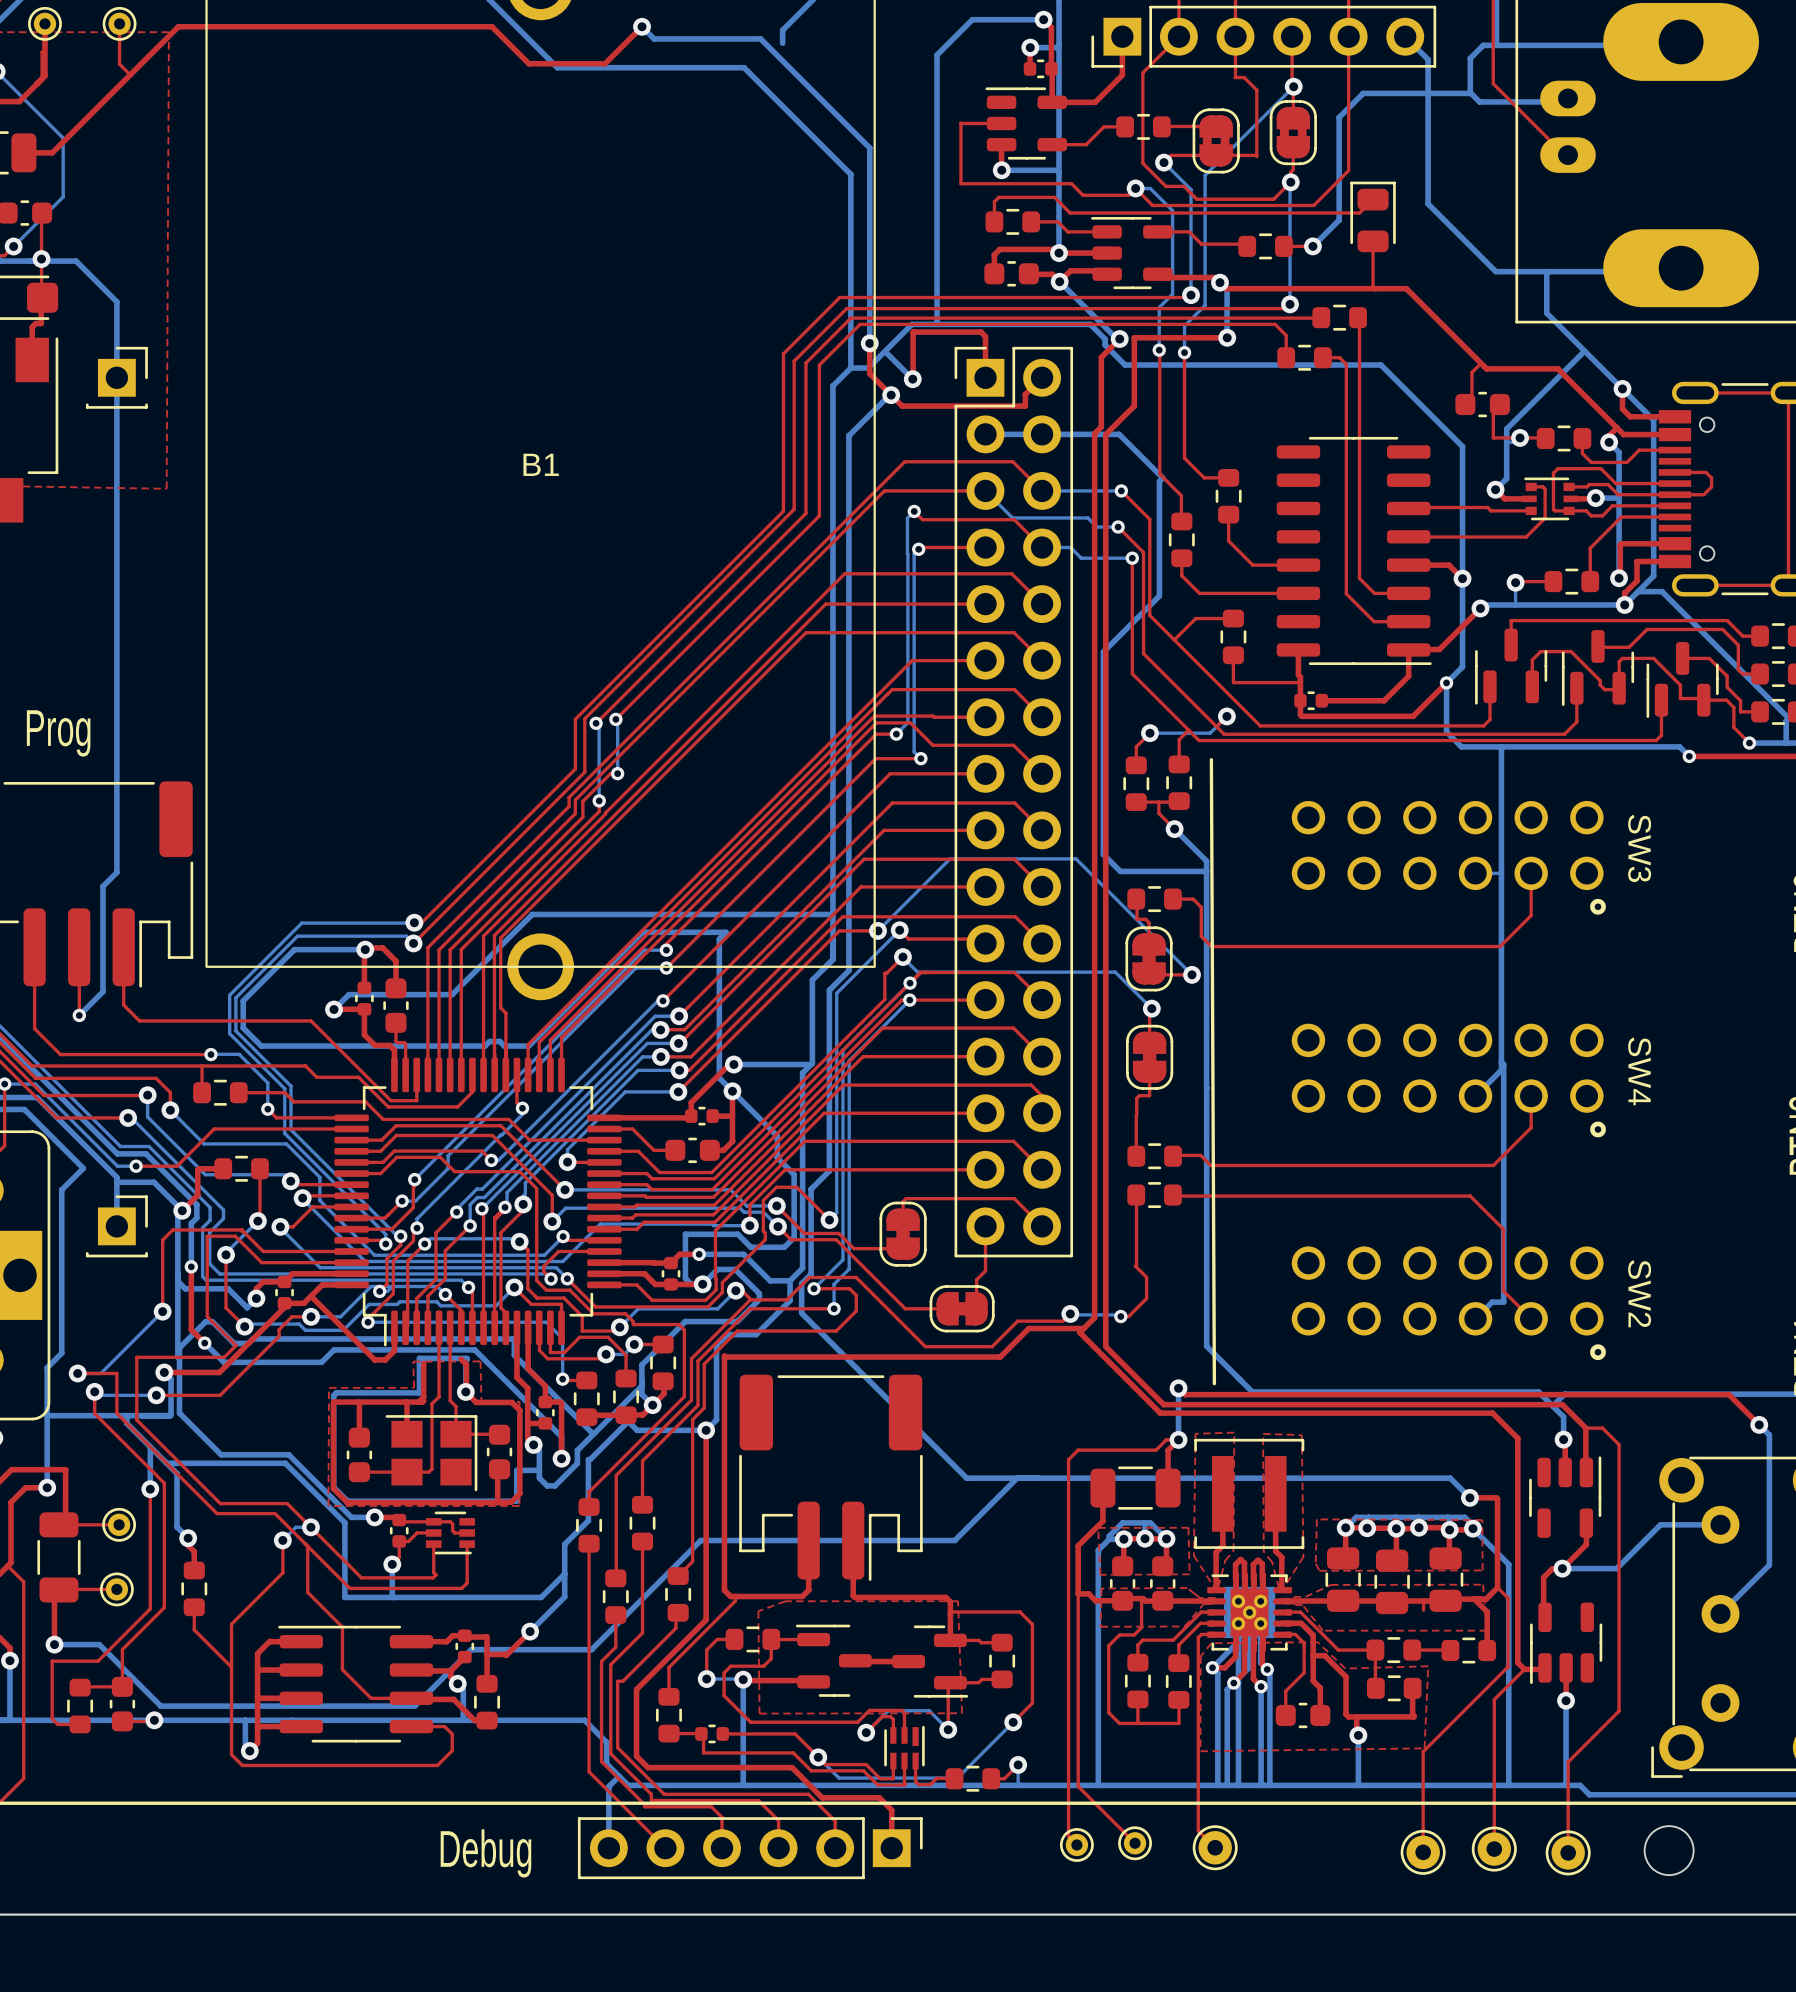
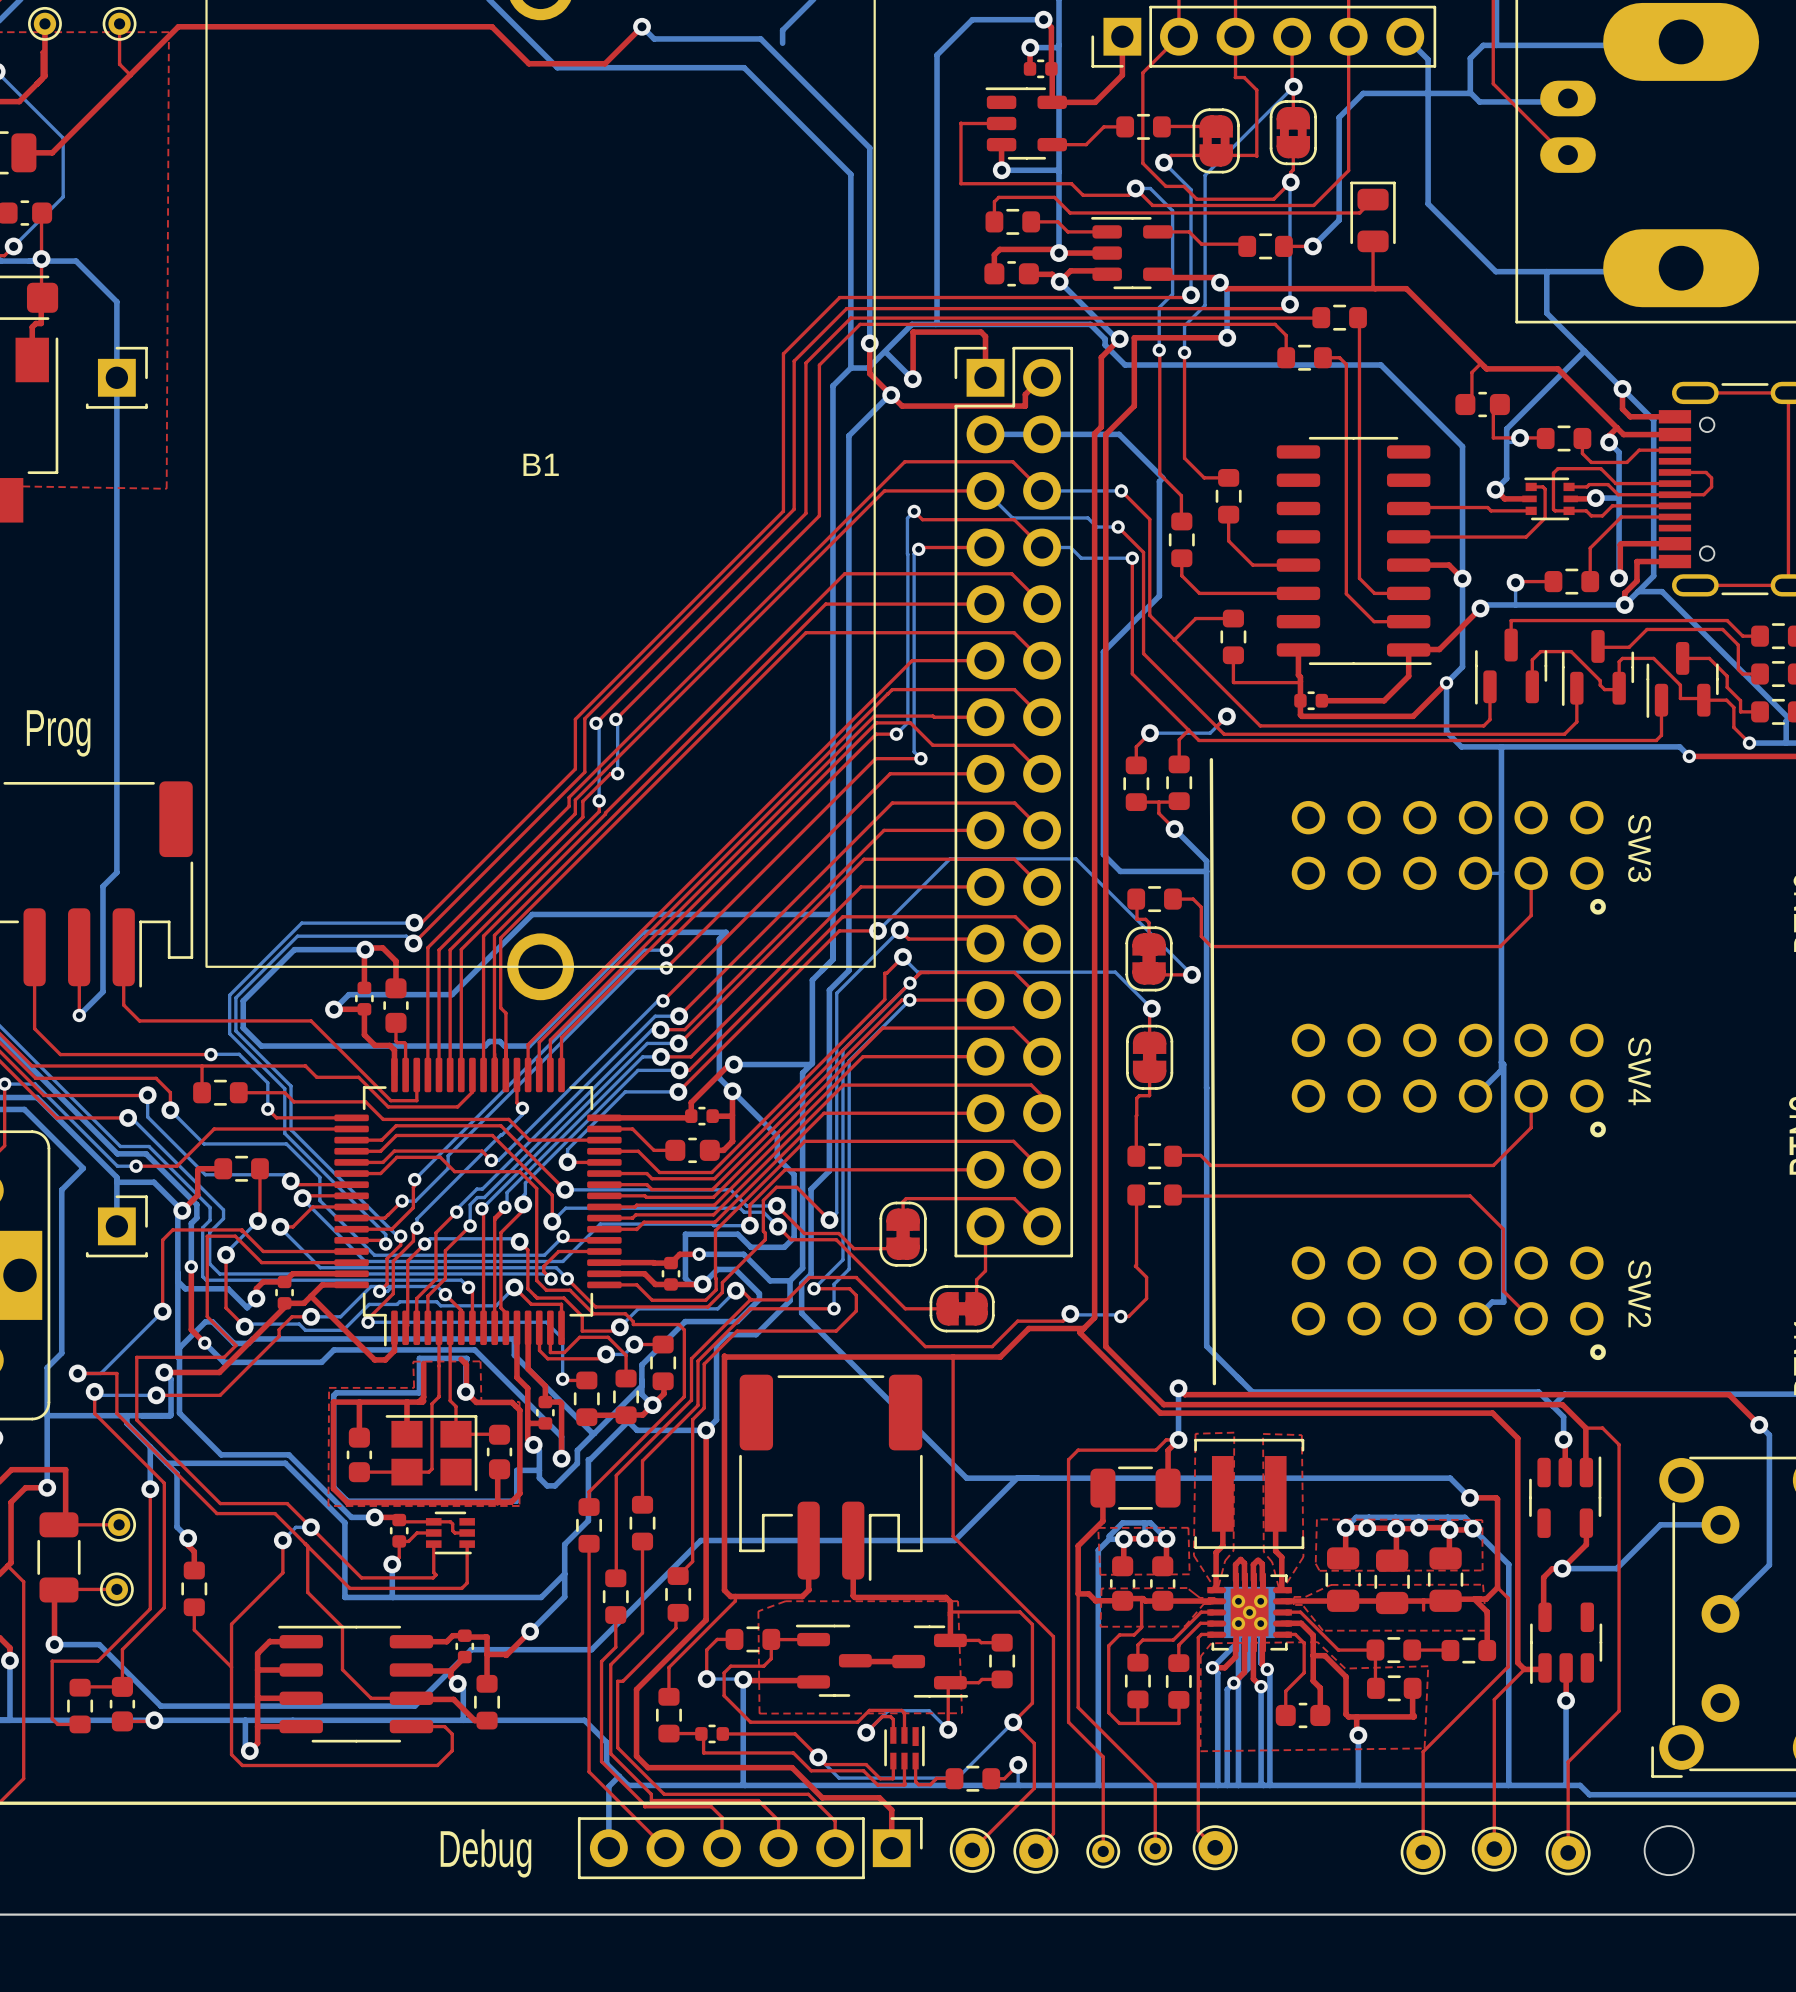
top track: none -> (953, 1357) (953, 1536) (1053, 1636) (1053, 1833) (1035, 1851)
top track: (1078, 1707) (1078, 1786) (1135, 1843) -> (1078, 1707) (1155, 1784) (1155, 1848)
top track: none -> (1013, 1722) (1034, 1743) (1034, 1788) (972, 1850)
top track: (1068, 1722) (1068, 1836) (1076, 1844) -> (1068, 1722) (1103, 1756) (1103, 1851)
part: (1135, 1843) -> none
part: (1076, 1844) -> none
part: none -> (1155, 1848)
part: none -> (972, 1850)
part: none -> (1035, 1851)
part: none -> (1103, 1851)

